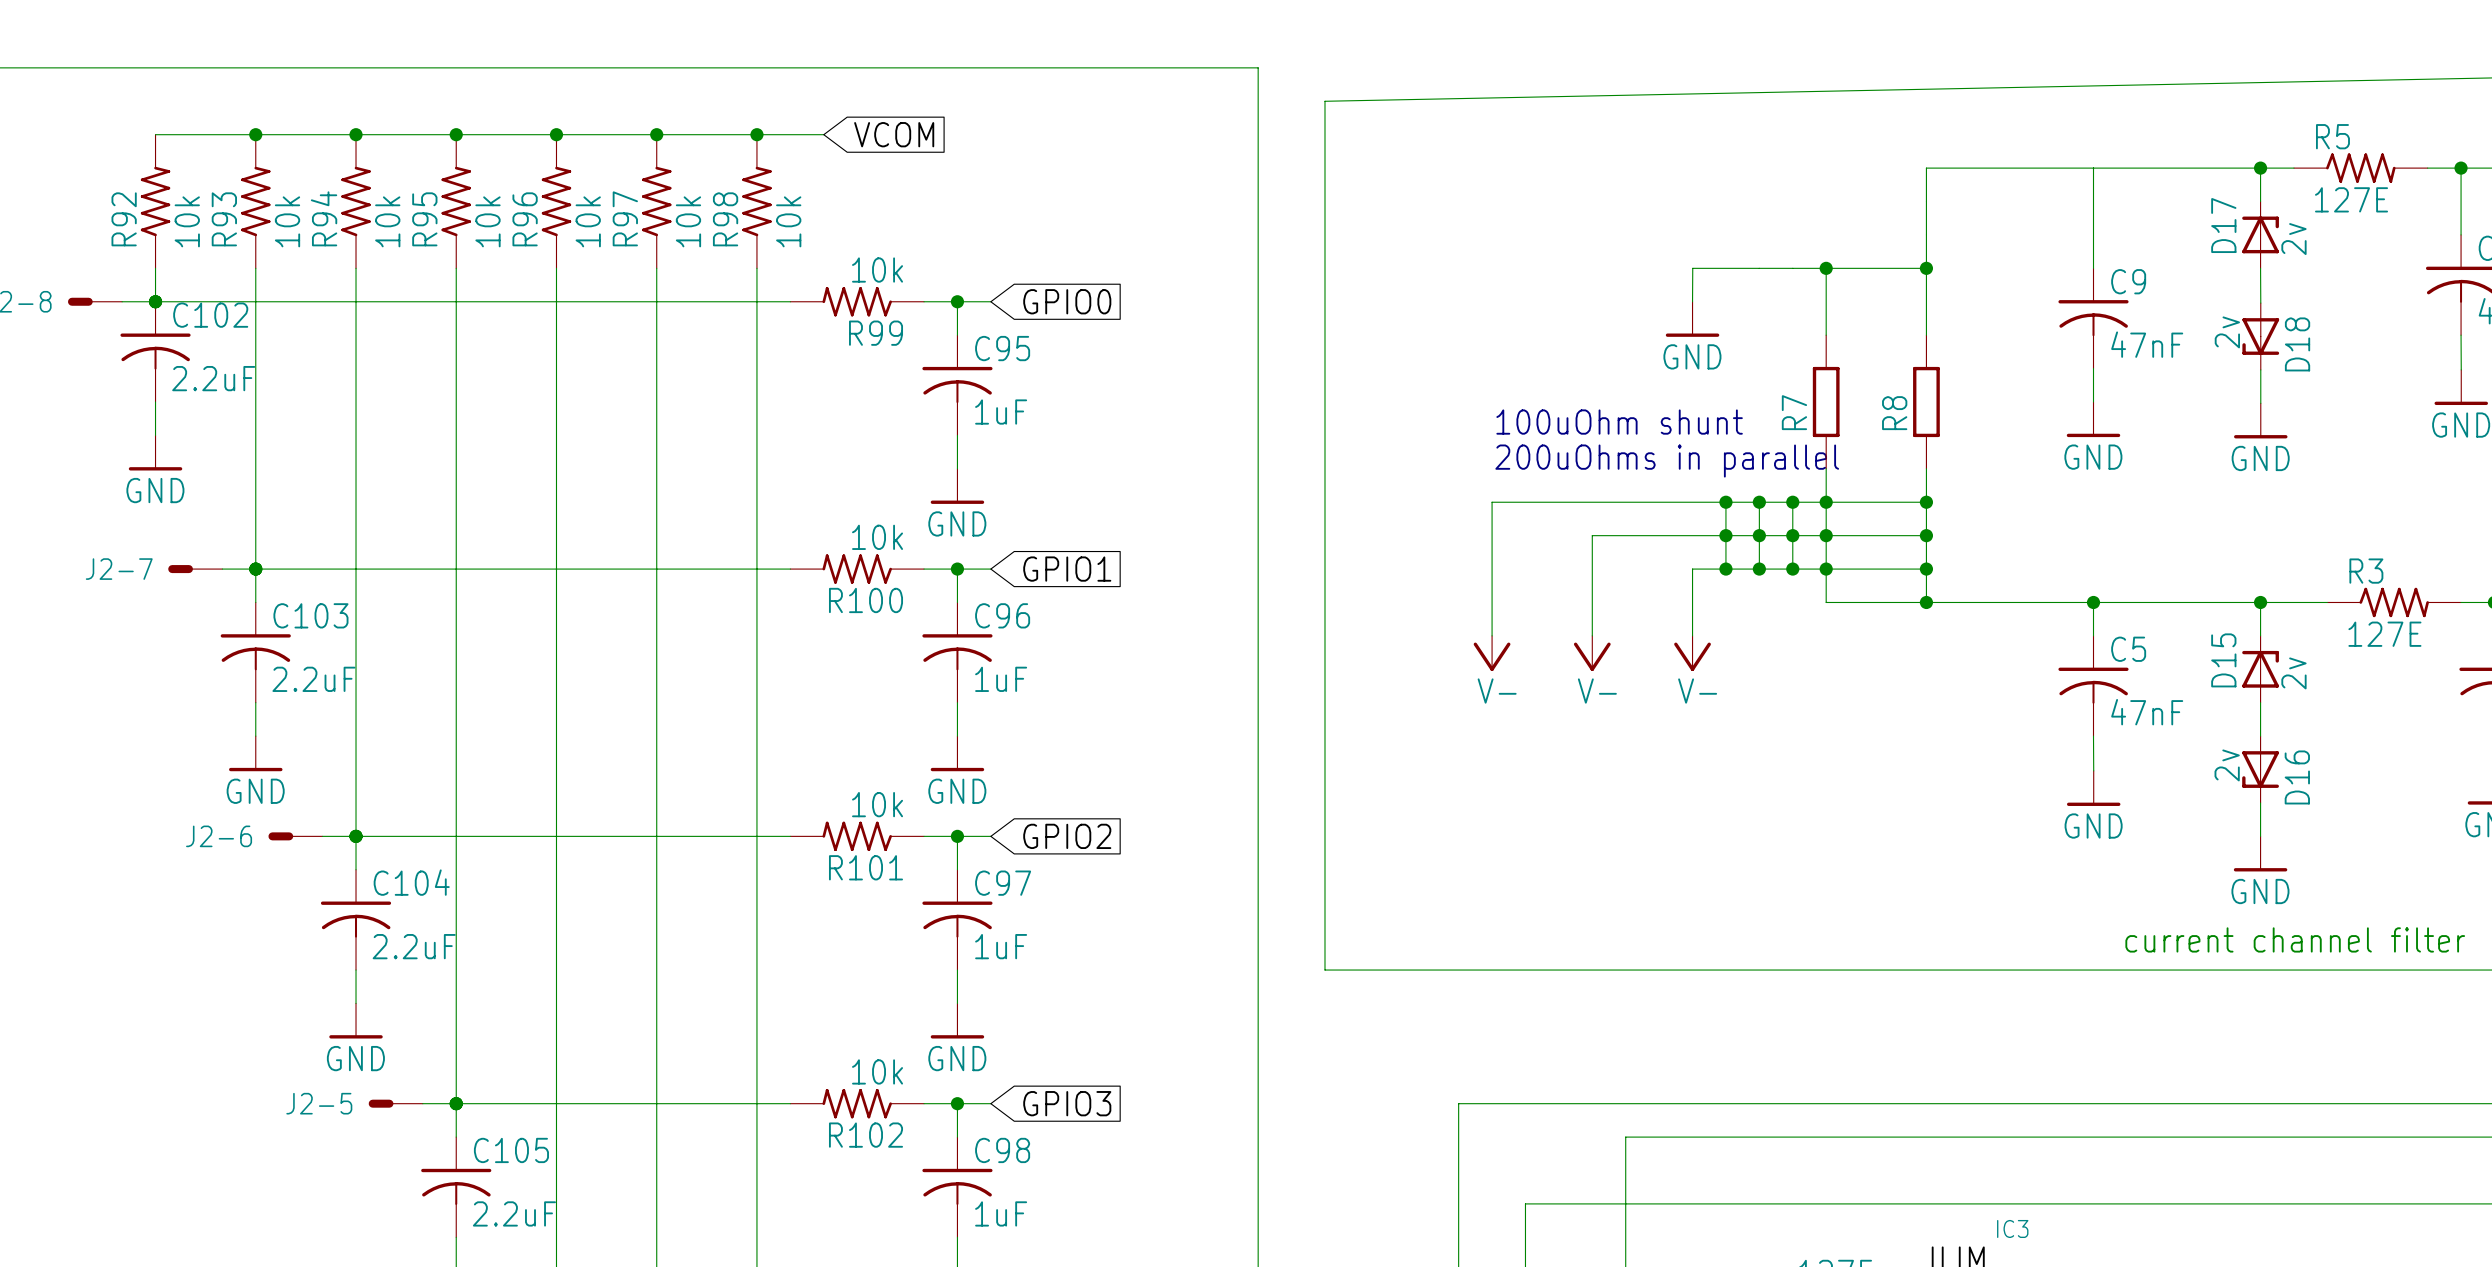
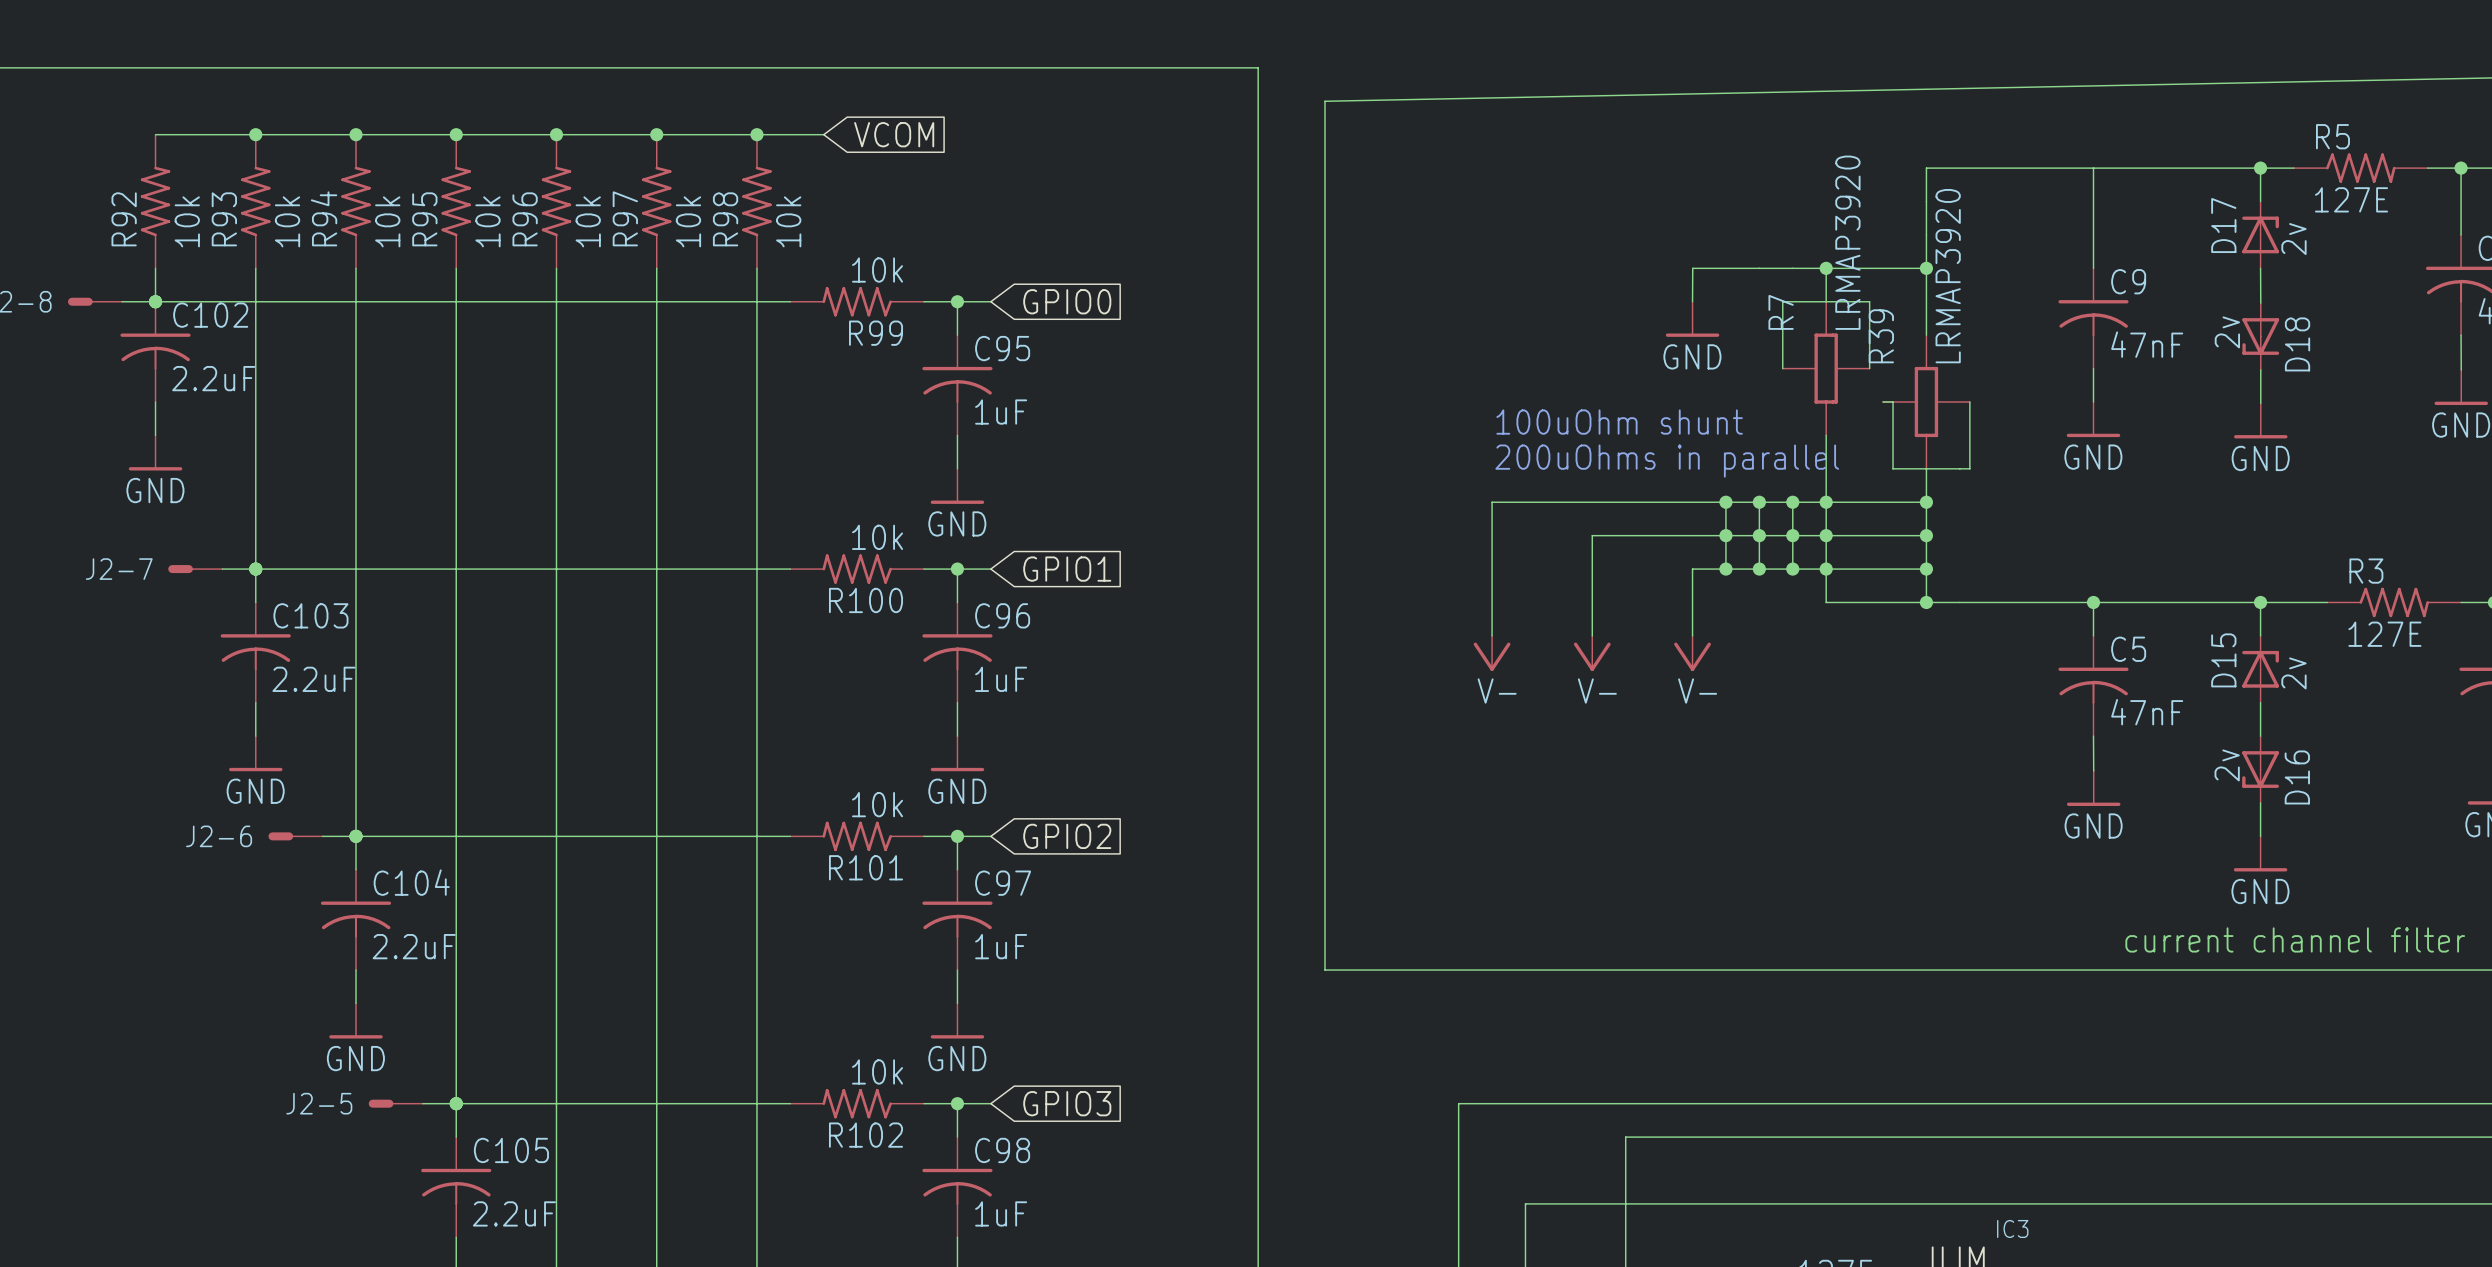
R7 value: none -> LRMAP3920 (1847, 242)
R7 symbol: [1812, 335, 1840, 469] -> [1782, 301, 1870, 436]
wire: none -> (1782, 368) (1782, 301) (1869, 301) (1869, 368)
wire: none -> (1882, 402) (1893, 402) (1893, 468) (1969, 468) (1969, 402)
R8: (1926, 402) -> none
R39: none -> LRMAP3920 (1926, 402)
R7 name position: R7 (1794, 412) -> R7 (1781, 312)

